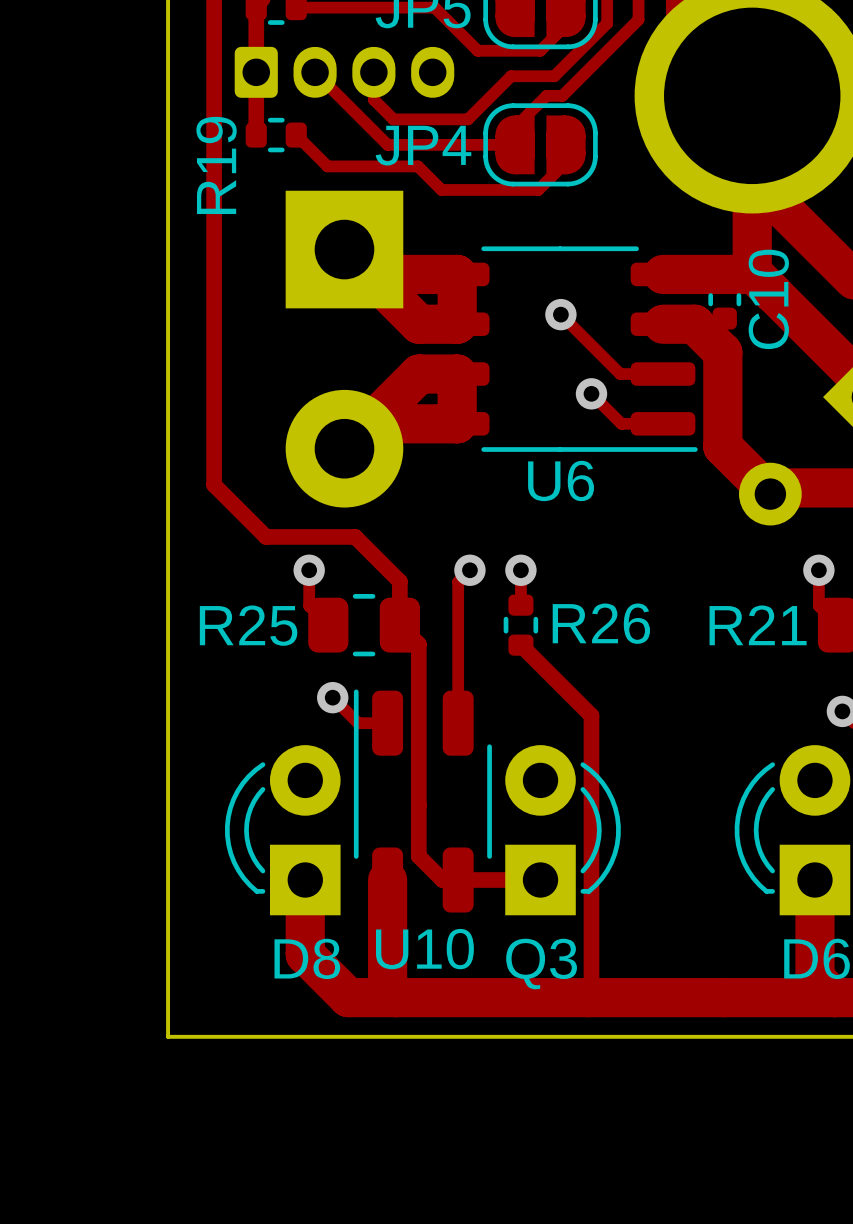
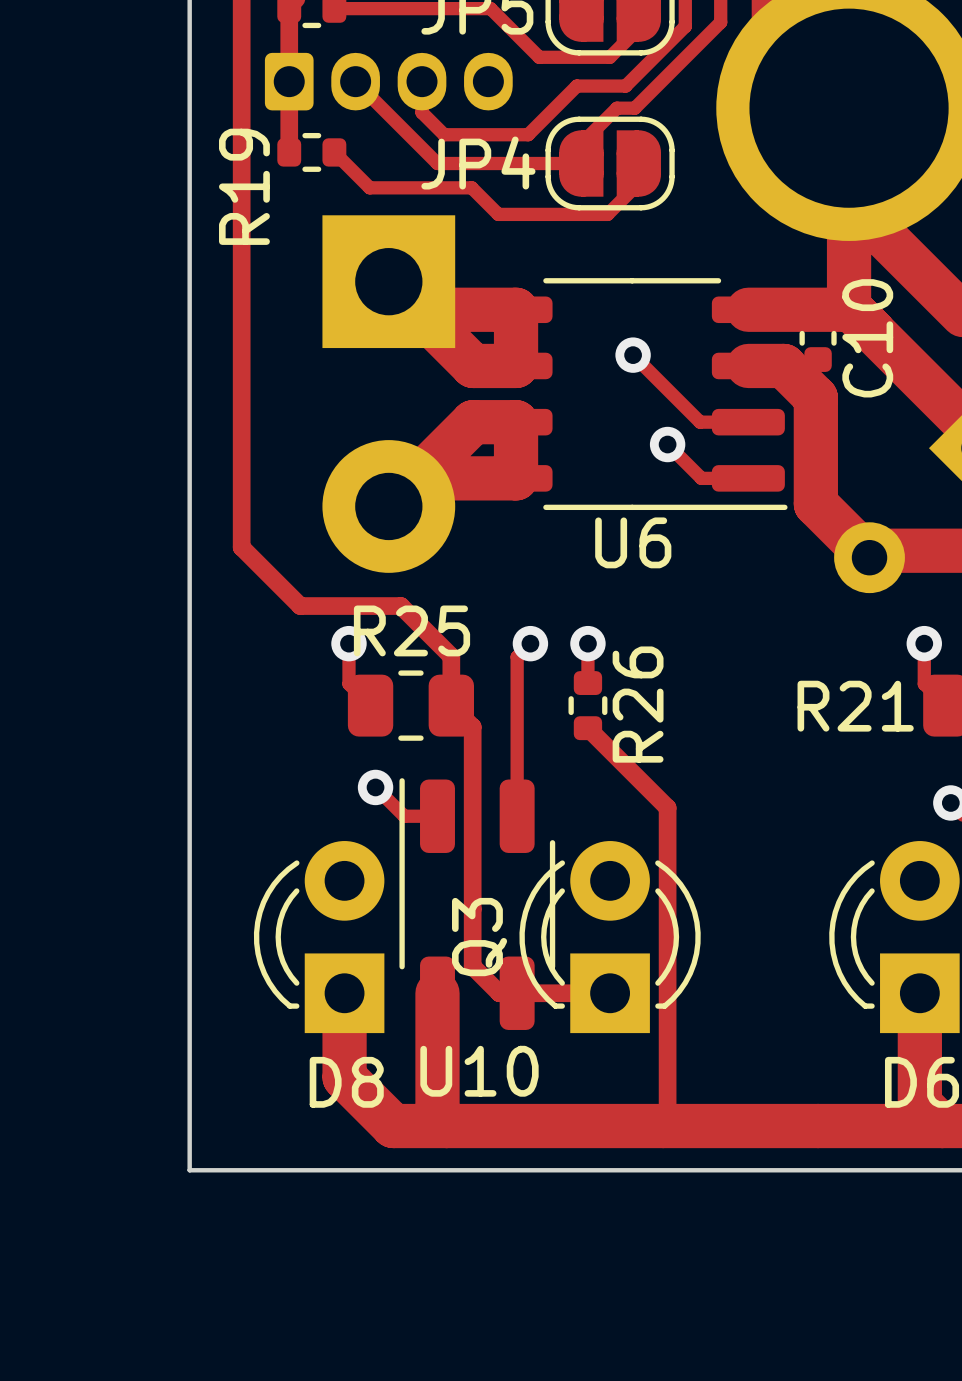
R26 name rotation: 0° (601, 623) -> 90° counterclockwise (638, 704)
R25 name position: R25 (248, 625) -> R25 (411, 630)
Q3 footprint: [505, 745, 621, 916] -> [519, 841, 701, 1034]
Q3 name position: Q3 (541, 964) -> Q3 (479, 937)

